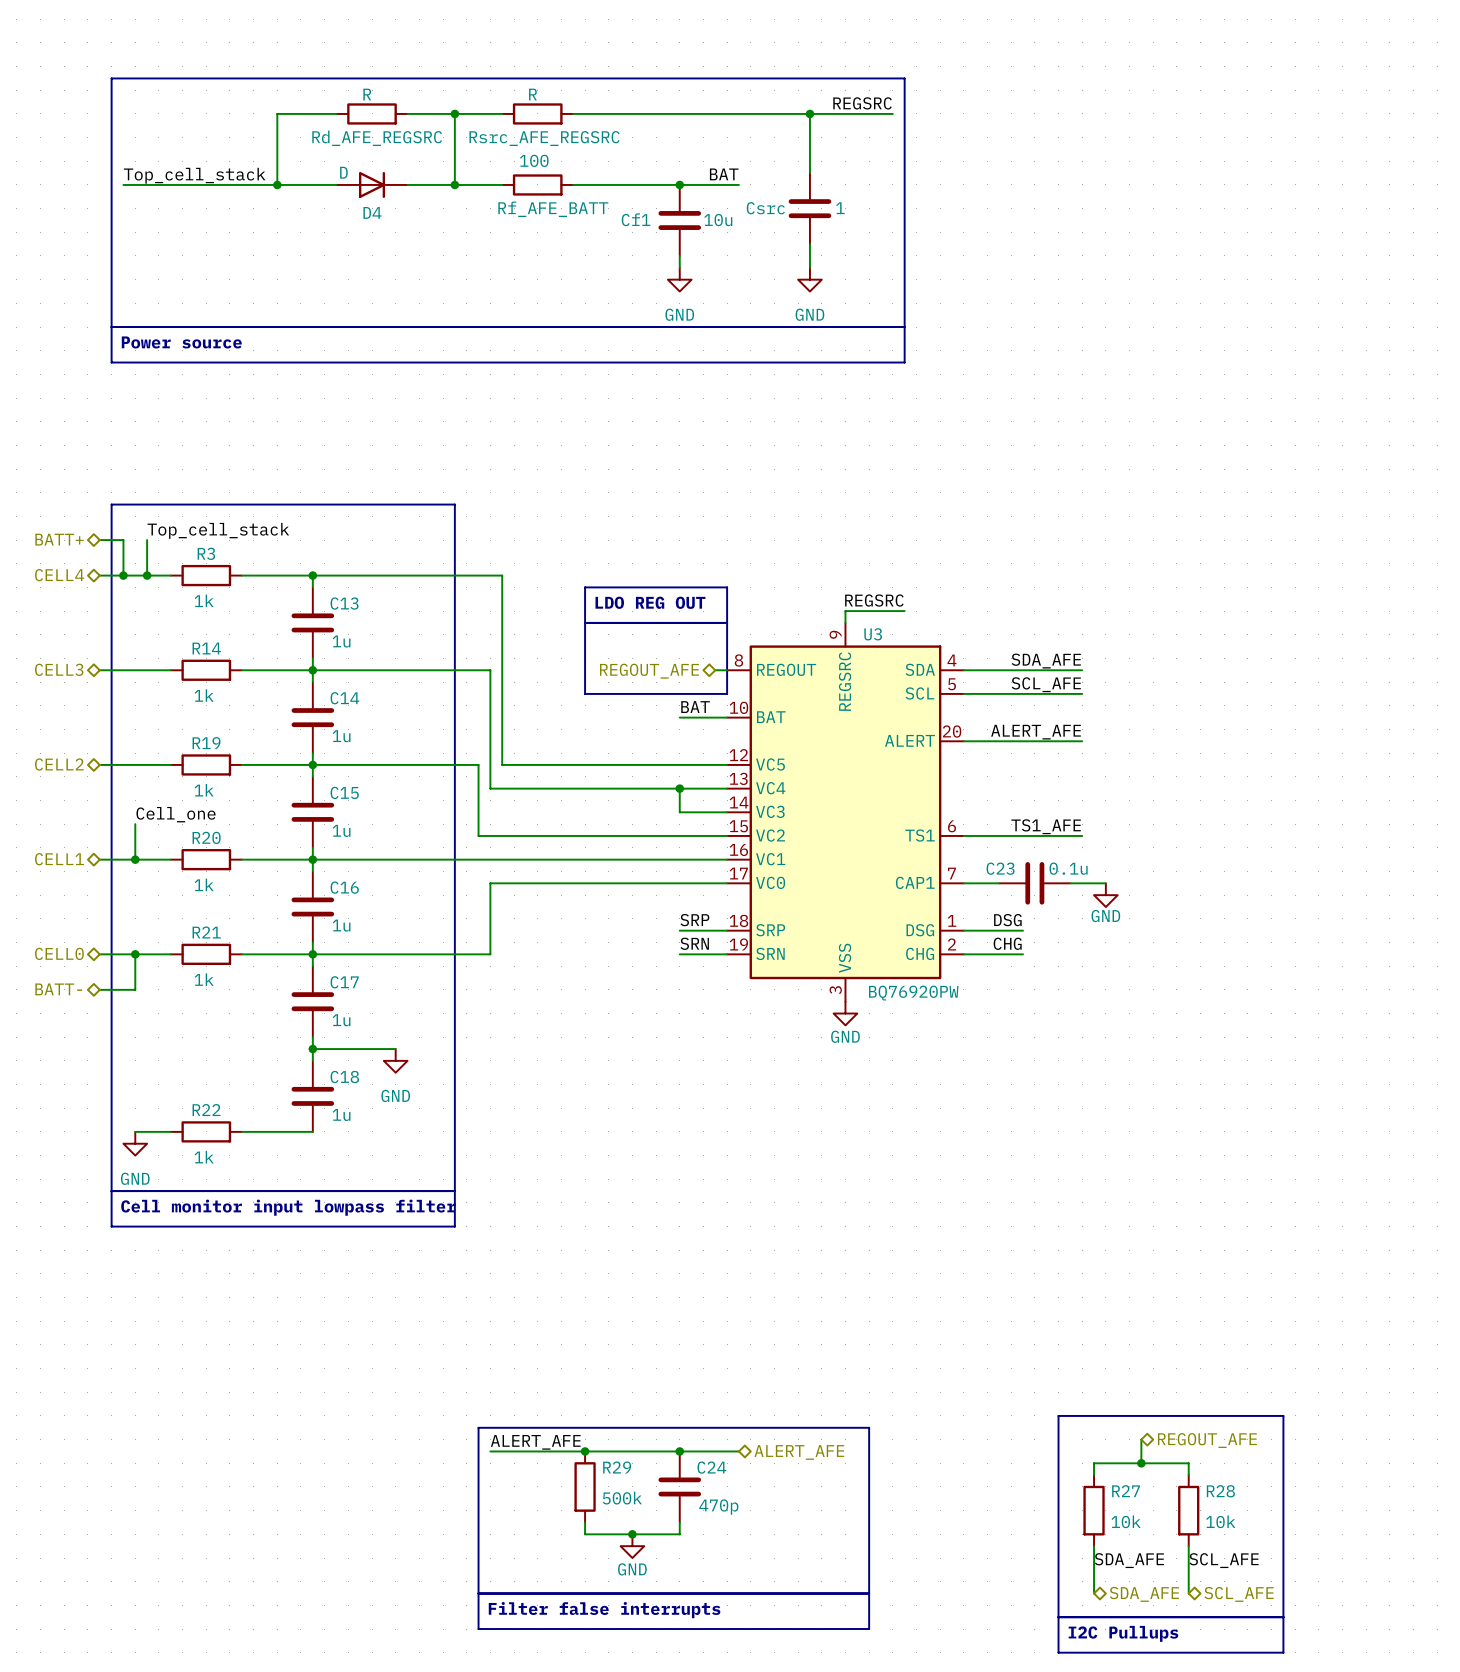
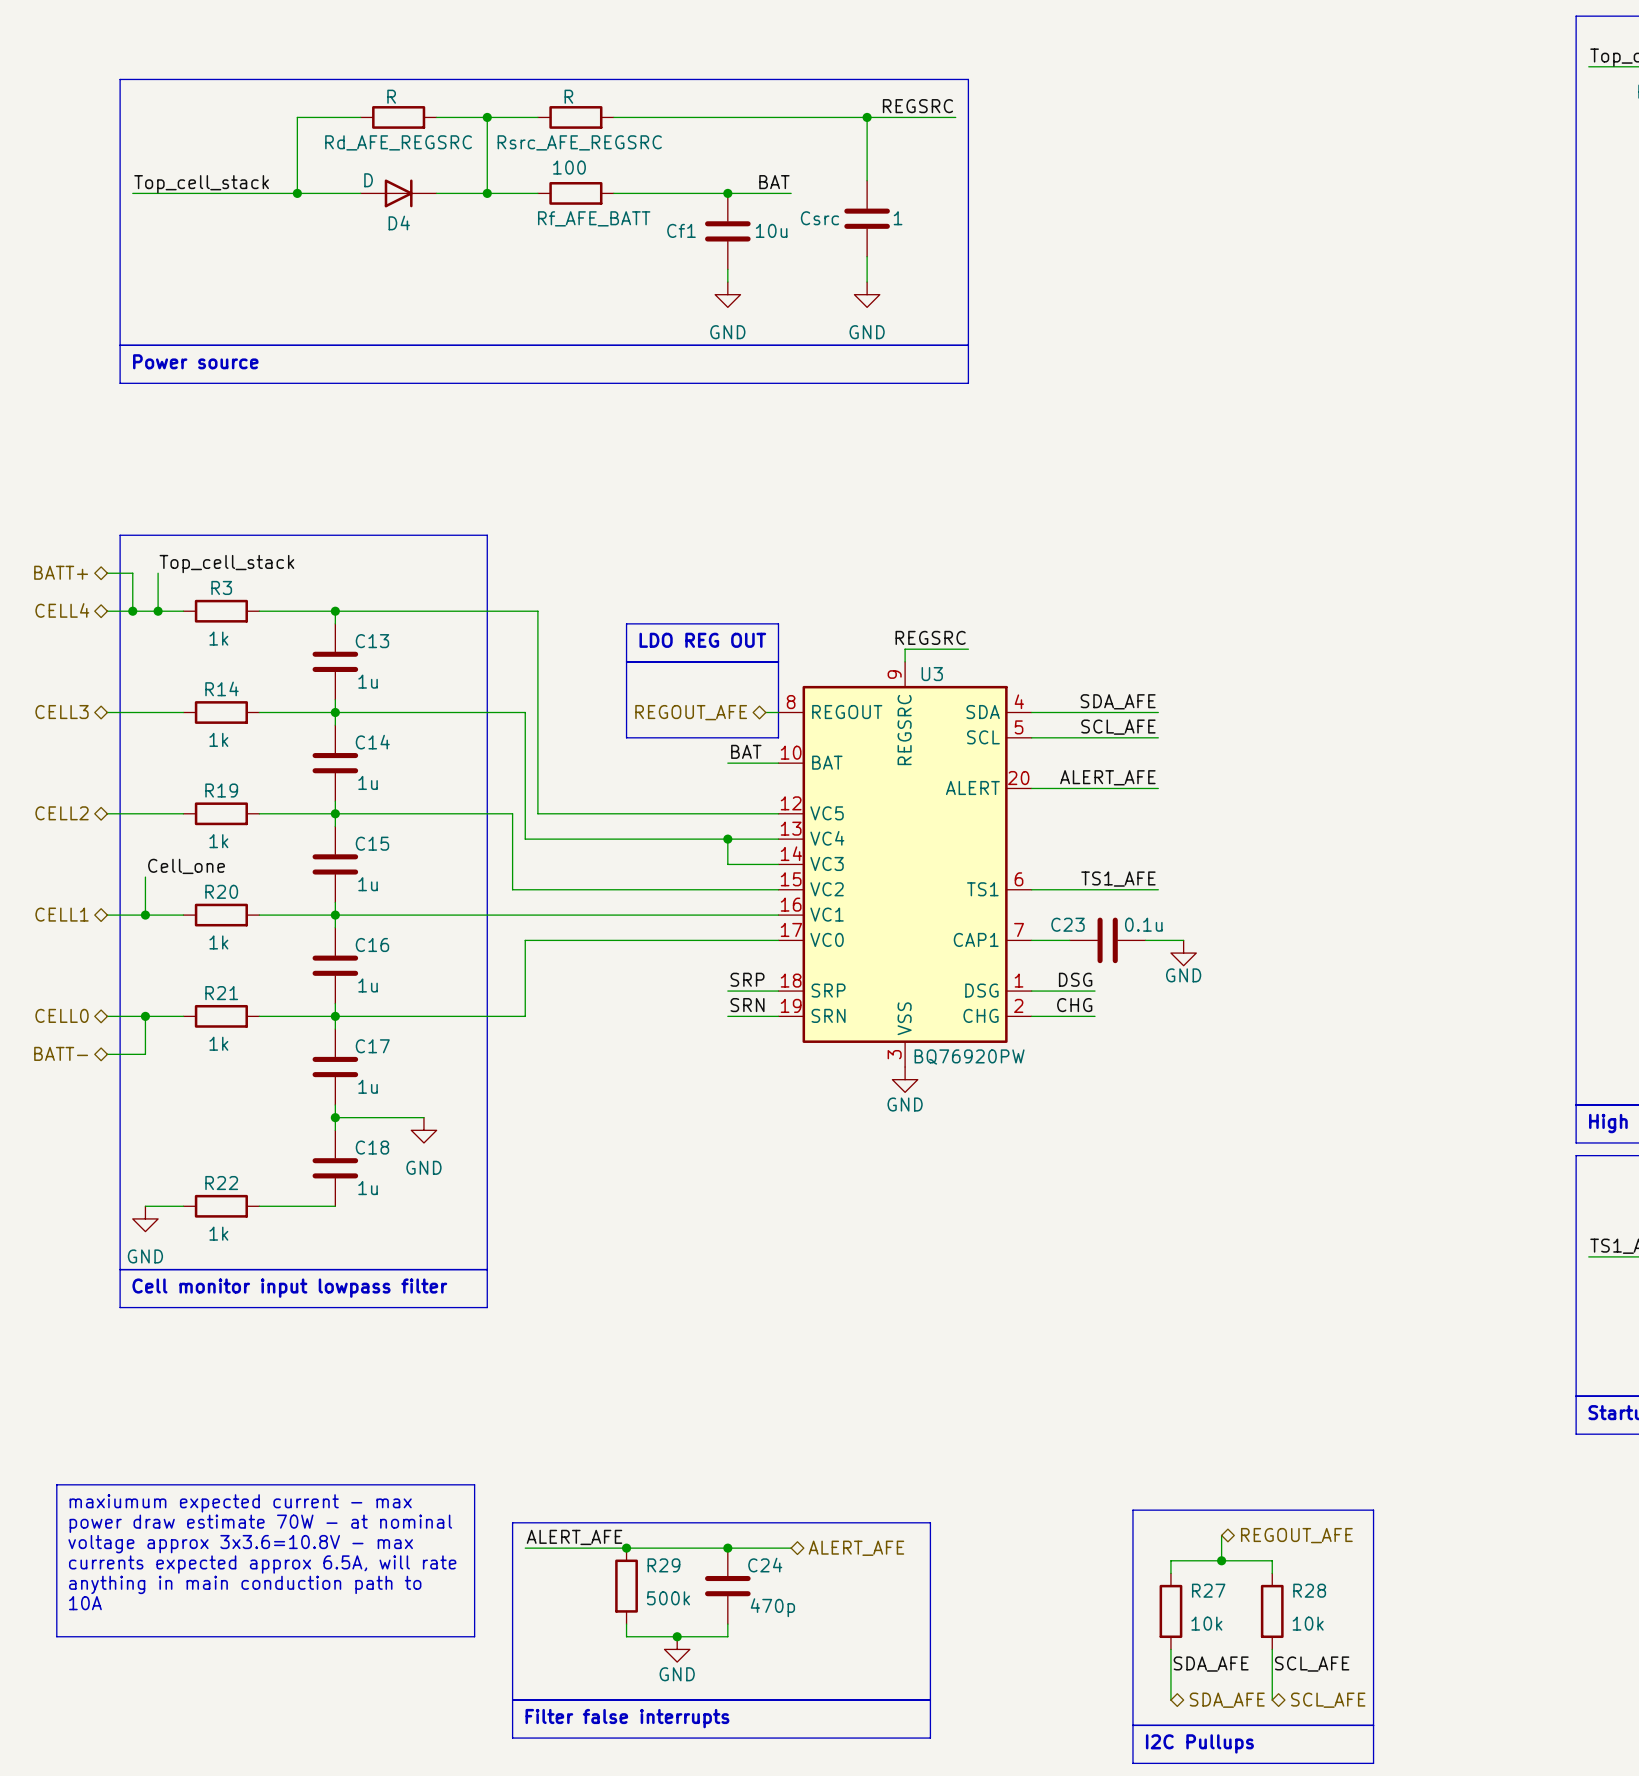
line: none -> (56, 1484) (474, 1484) (474, 1636) (56, 1636) (56, 1484)
text: none -> maxiumum expected current - max (240, 1503)
text: none -> power draw estimate 70W - at nominal (260, 1523)
text: none -> voltage approx 3x3.6=10.8V - max (240, 1544)
text: none -> currents expected approx 6.5A, will rate (262, 1564)
text: none -> anything in main conduction path to (245, 1584)
text: none -> 10A (85, 1603)

